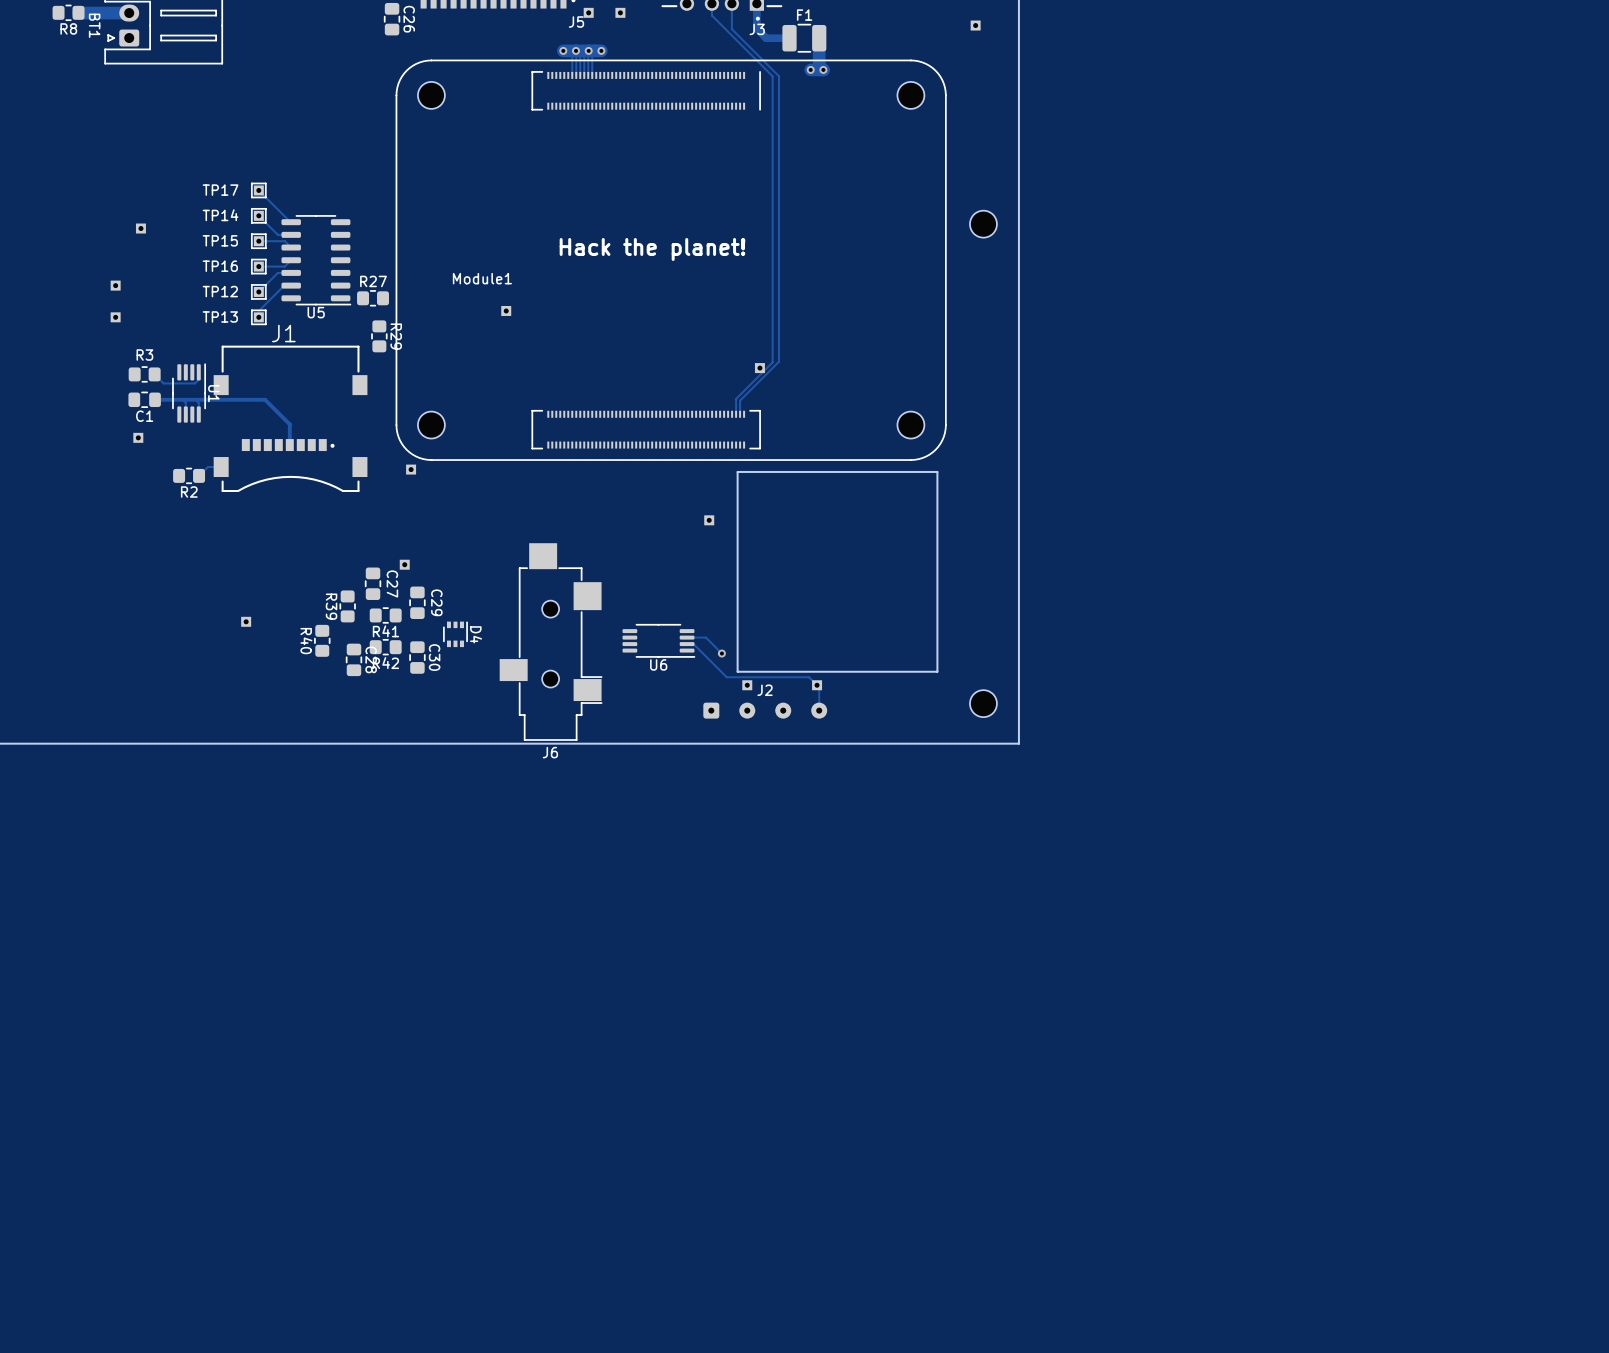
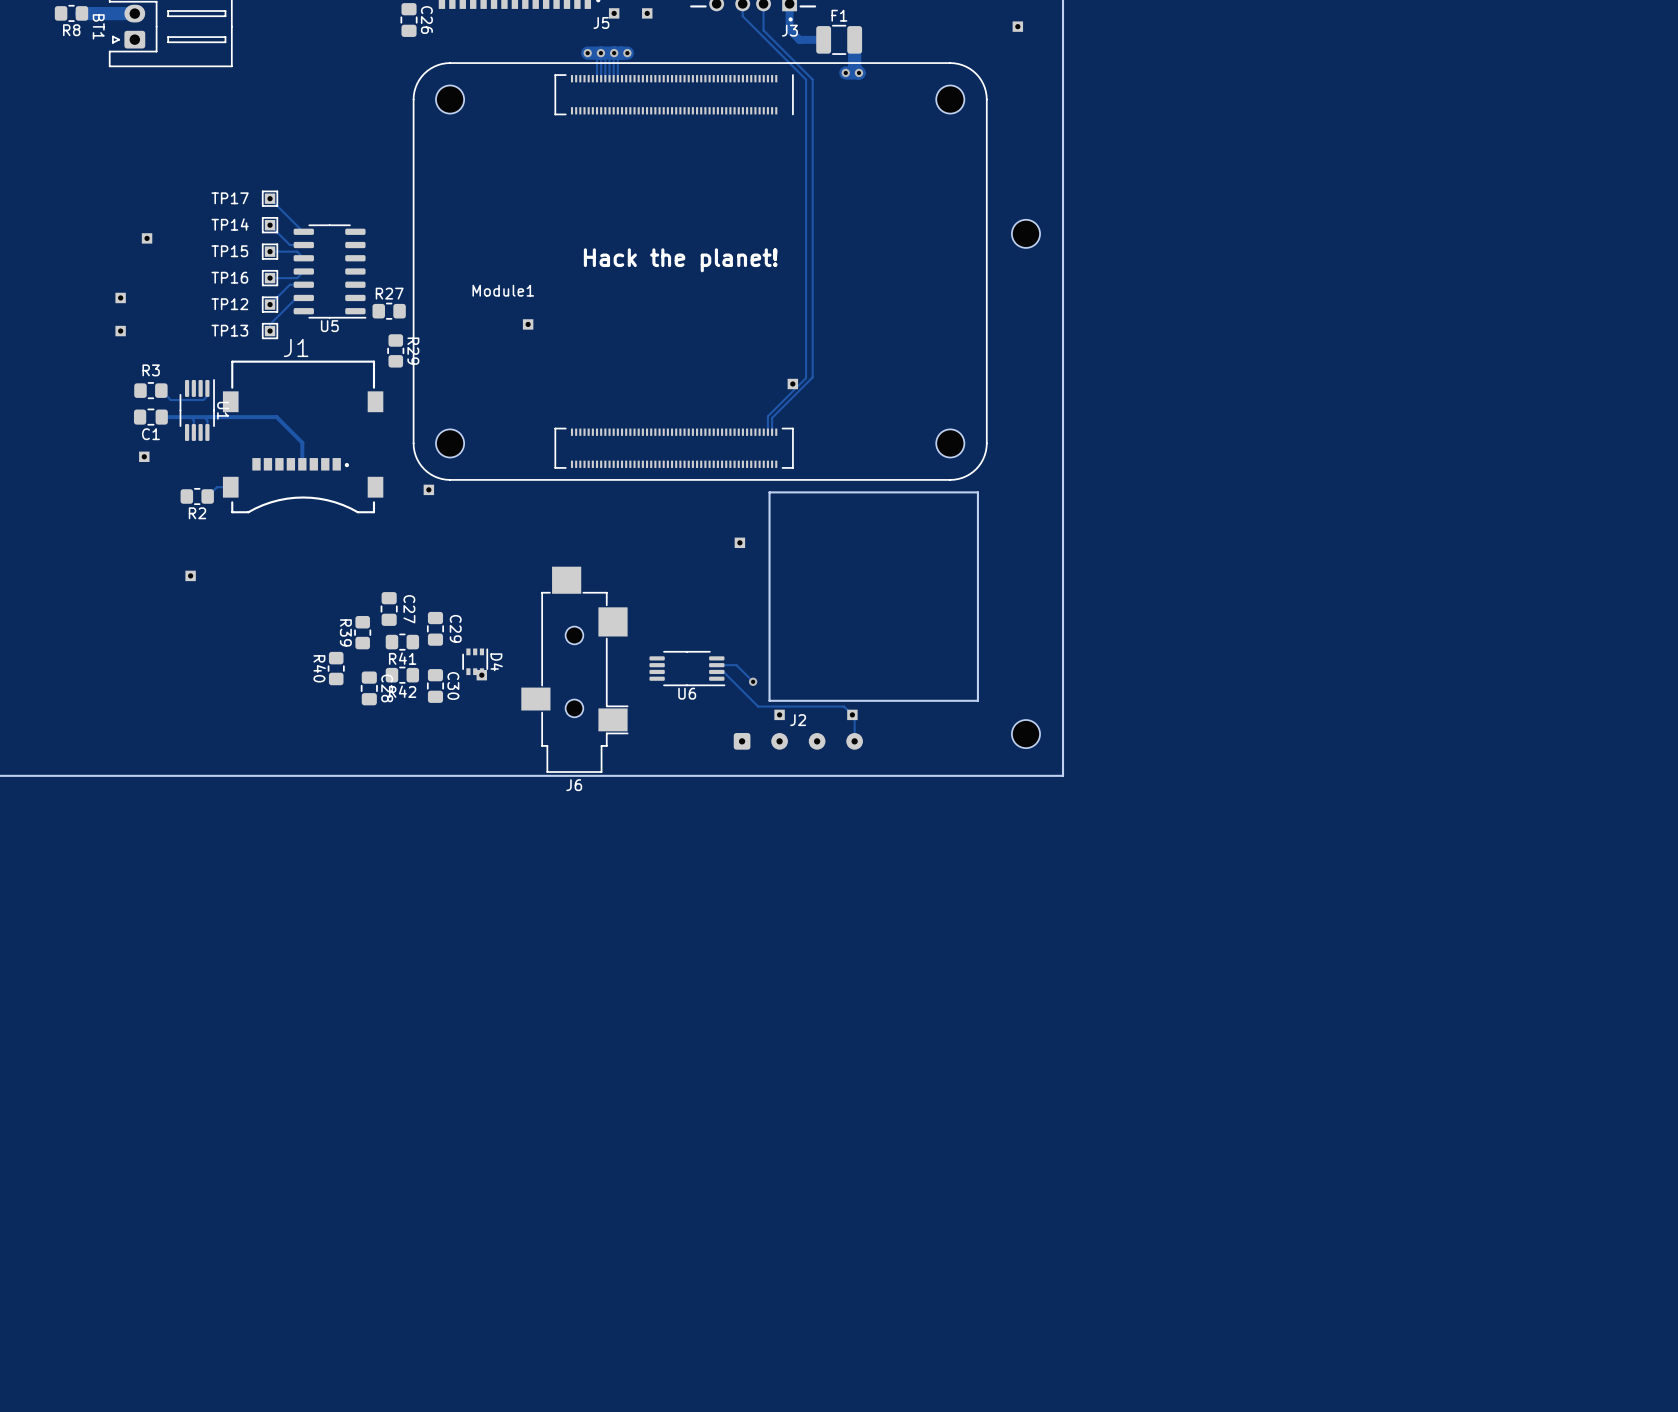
part position: (404, 564) -> (481, 675)
part position: (246, 621) -> (190, 575)

